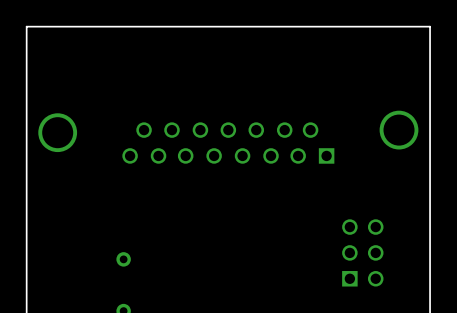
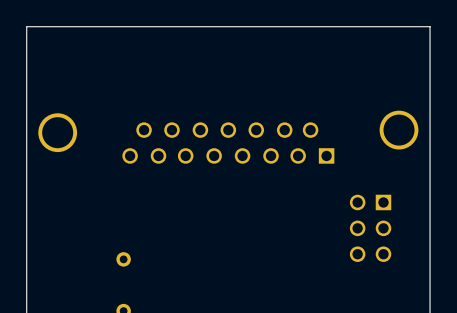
part rotation: 0° (362, 252) -> 180° (370, 228)

